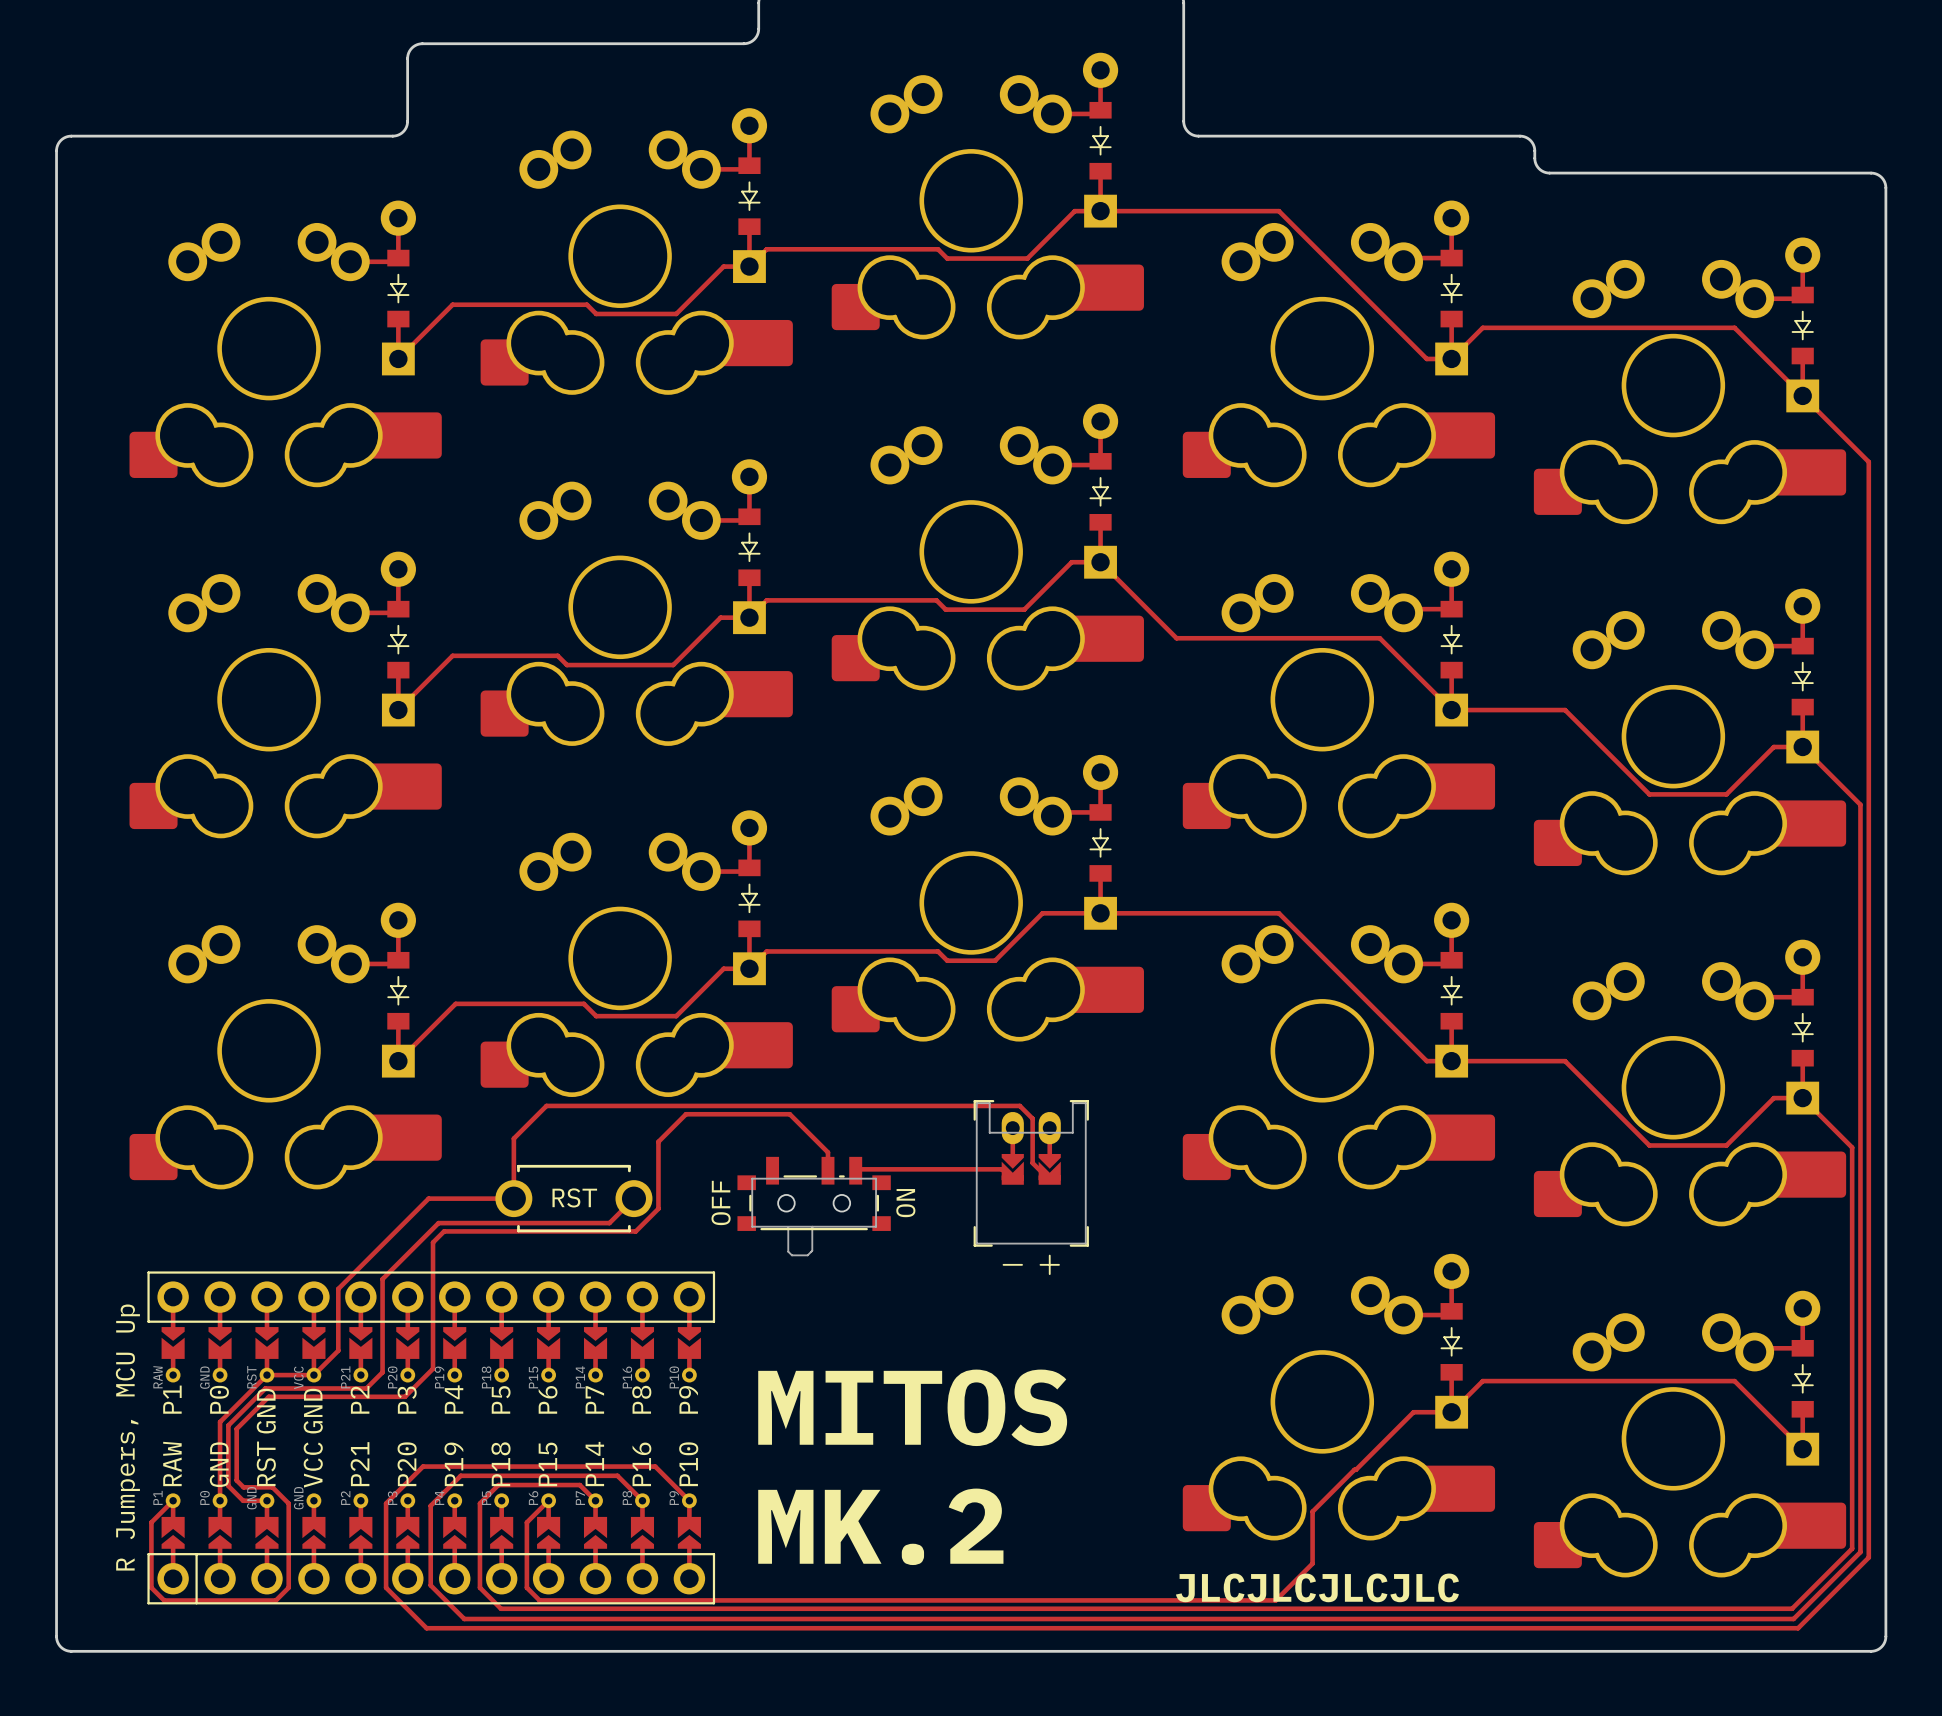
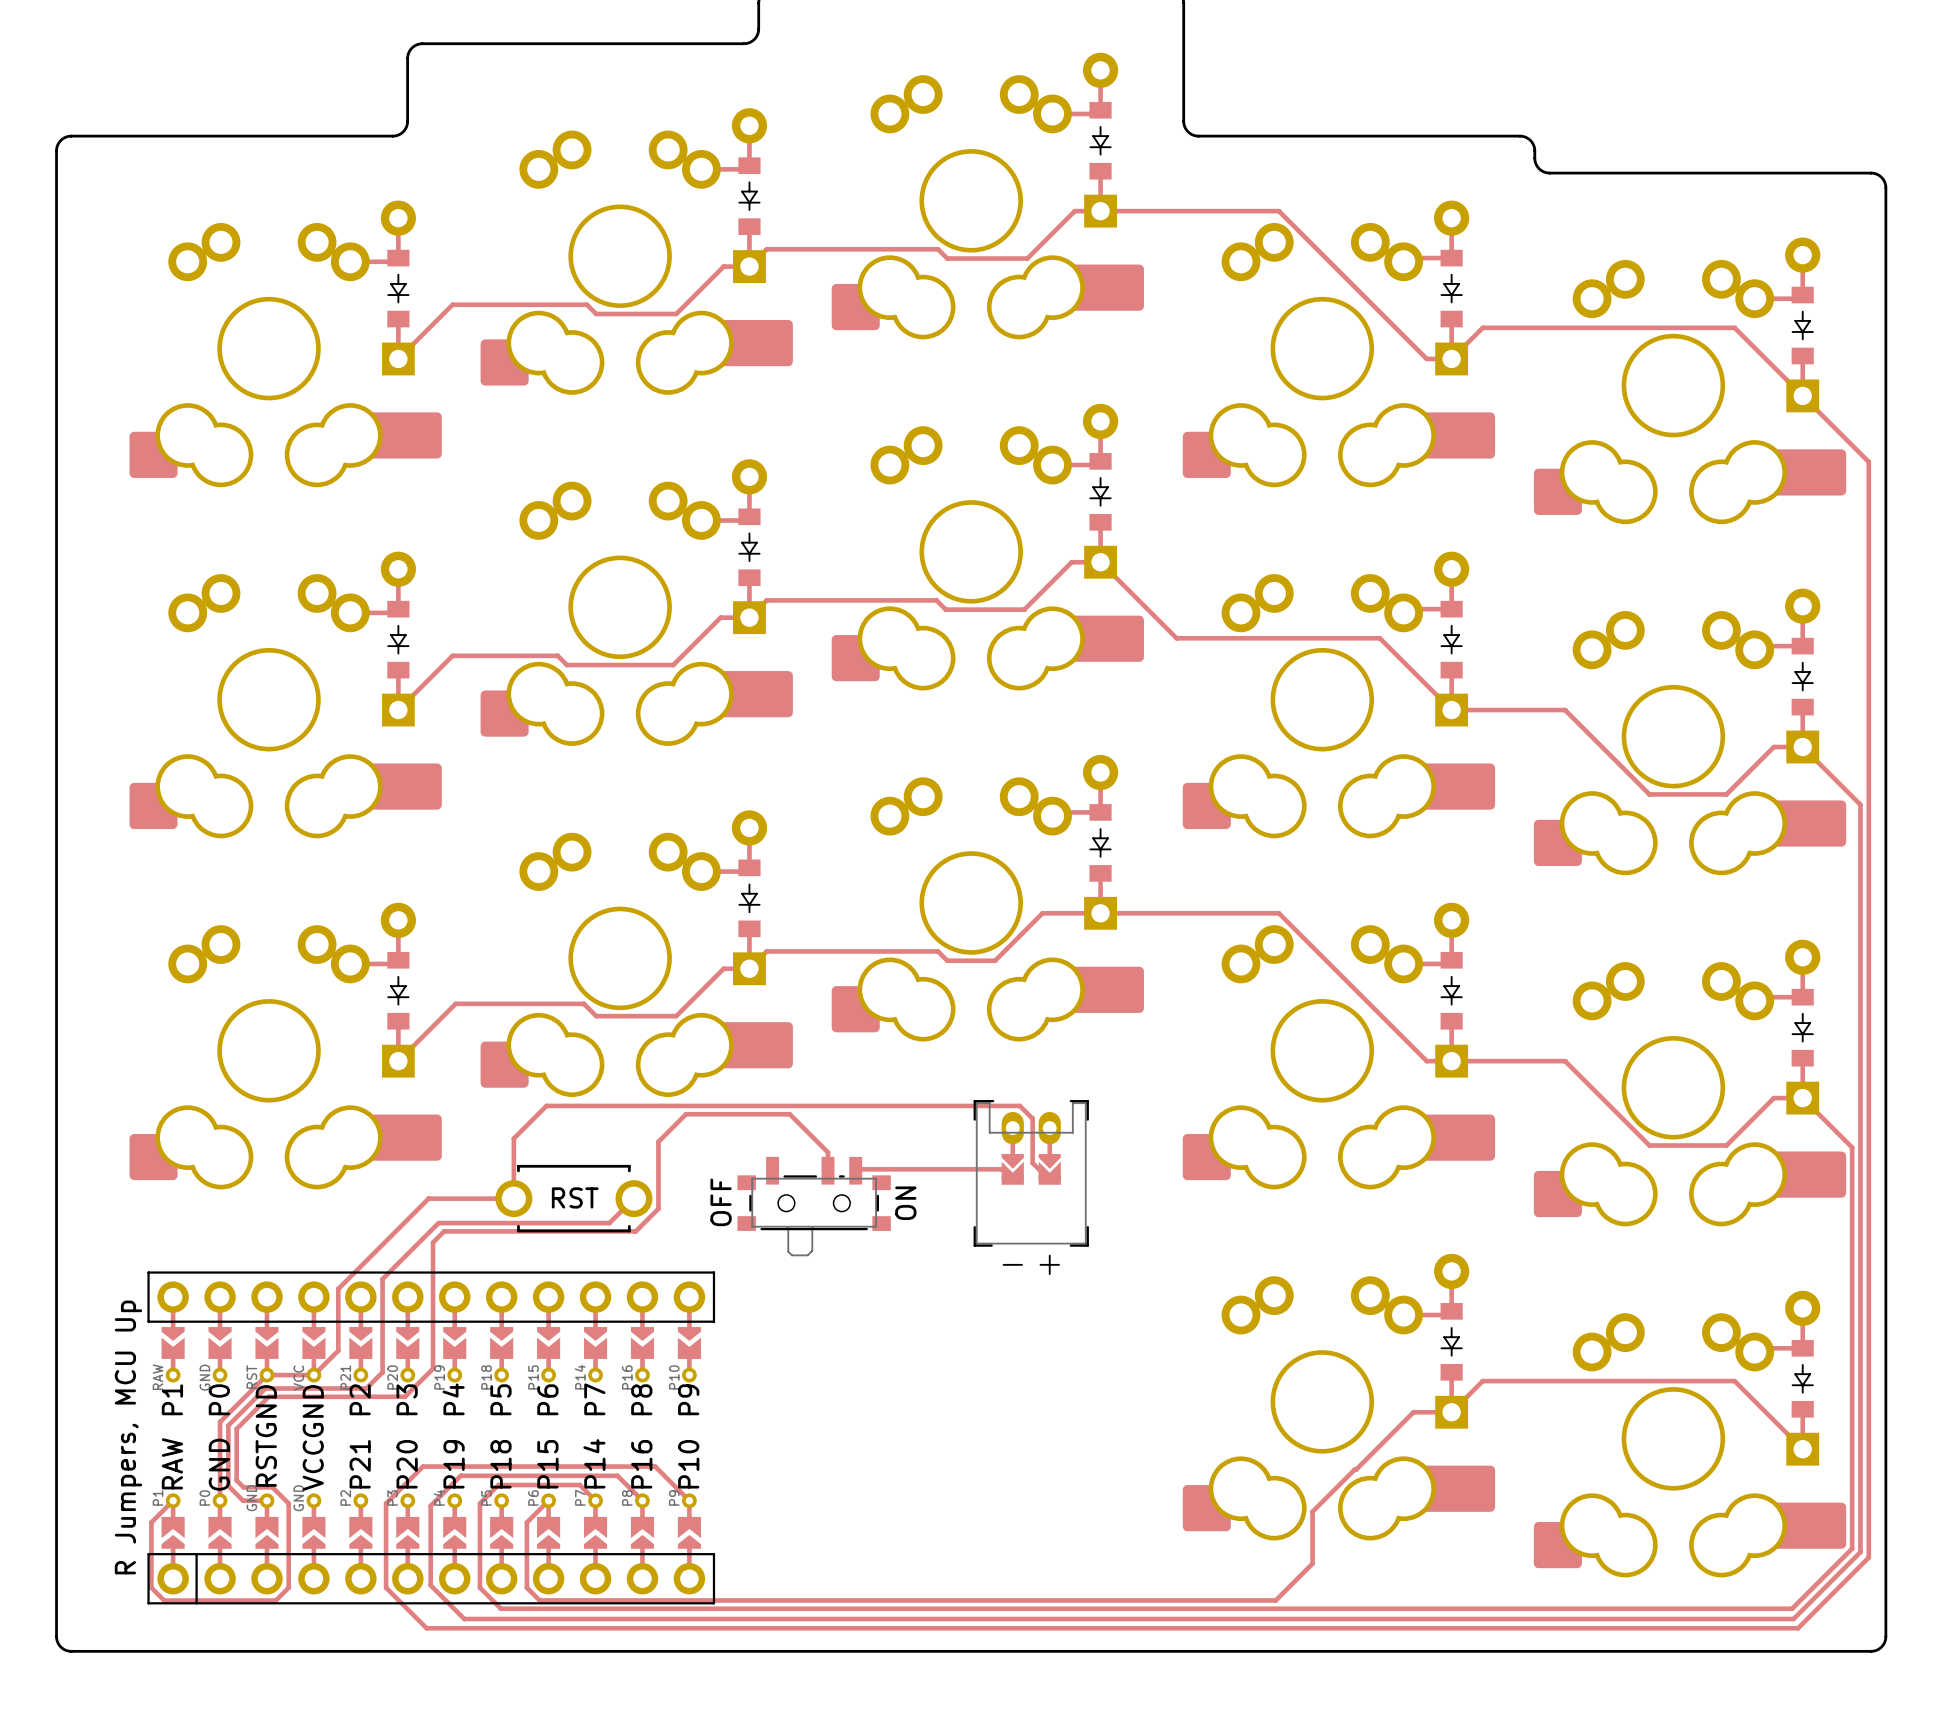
text: MITOS (912, 1407) -> none
text: MK.2 (880, 1526) -> none
text: JLCJLCJLCJLC (1317, 1587) -> none

